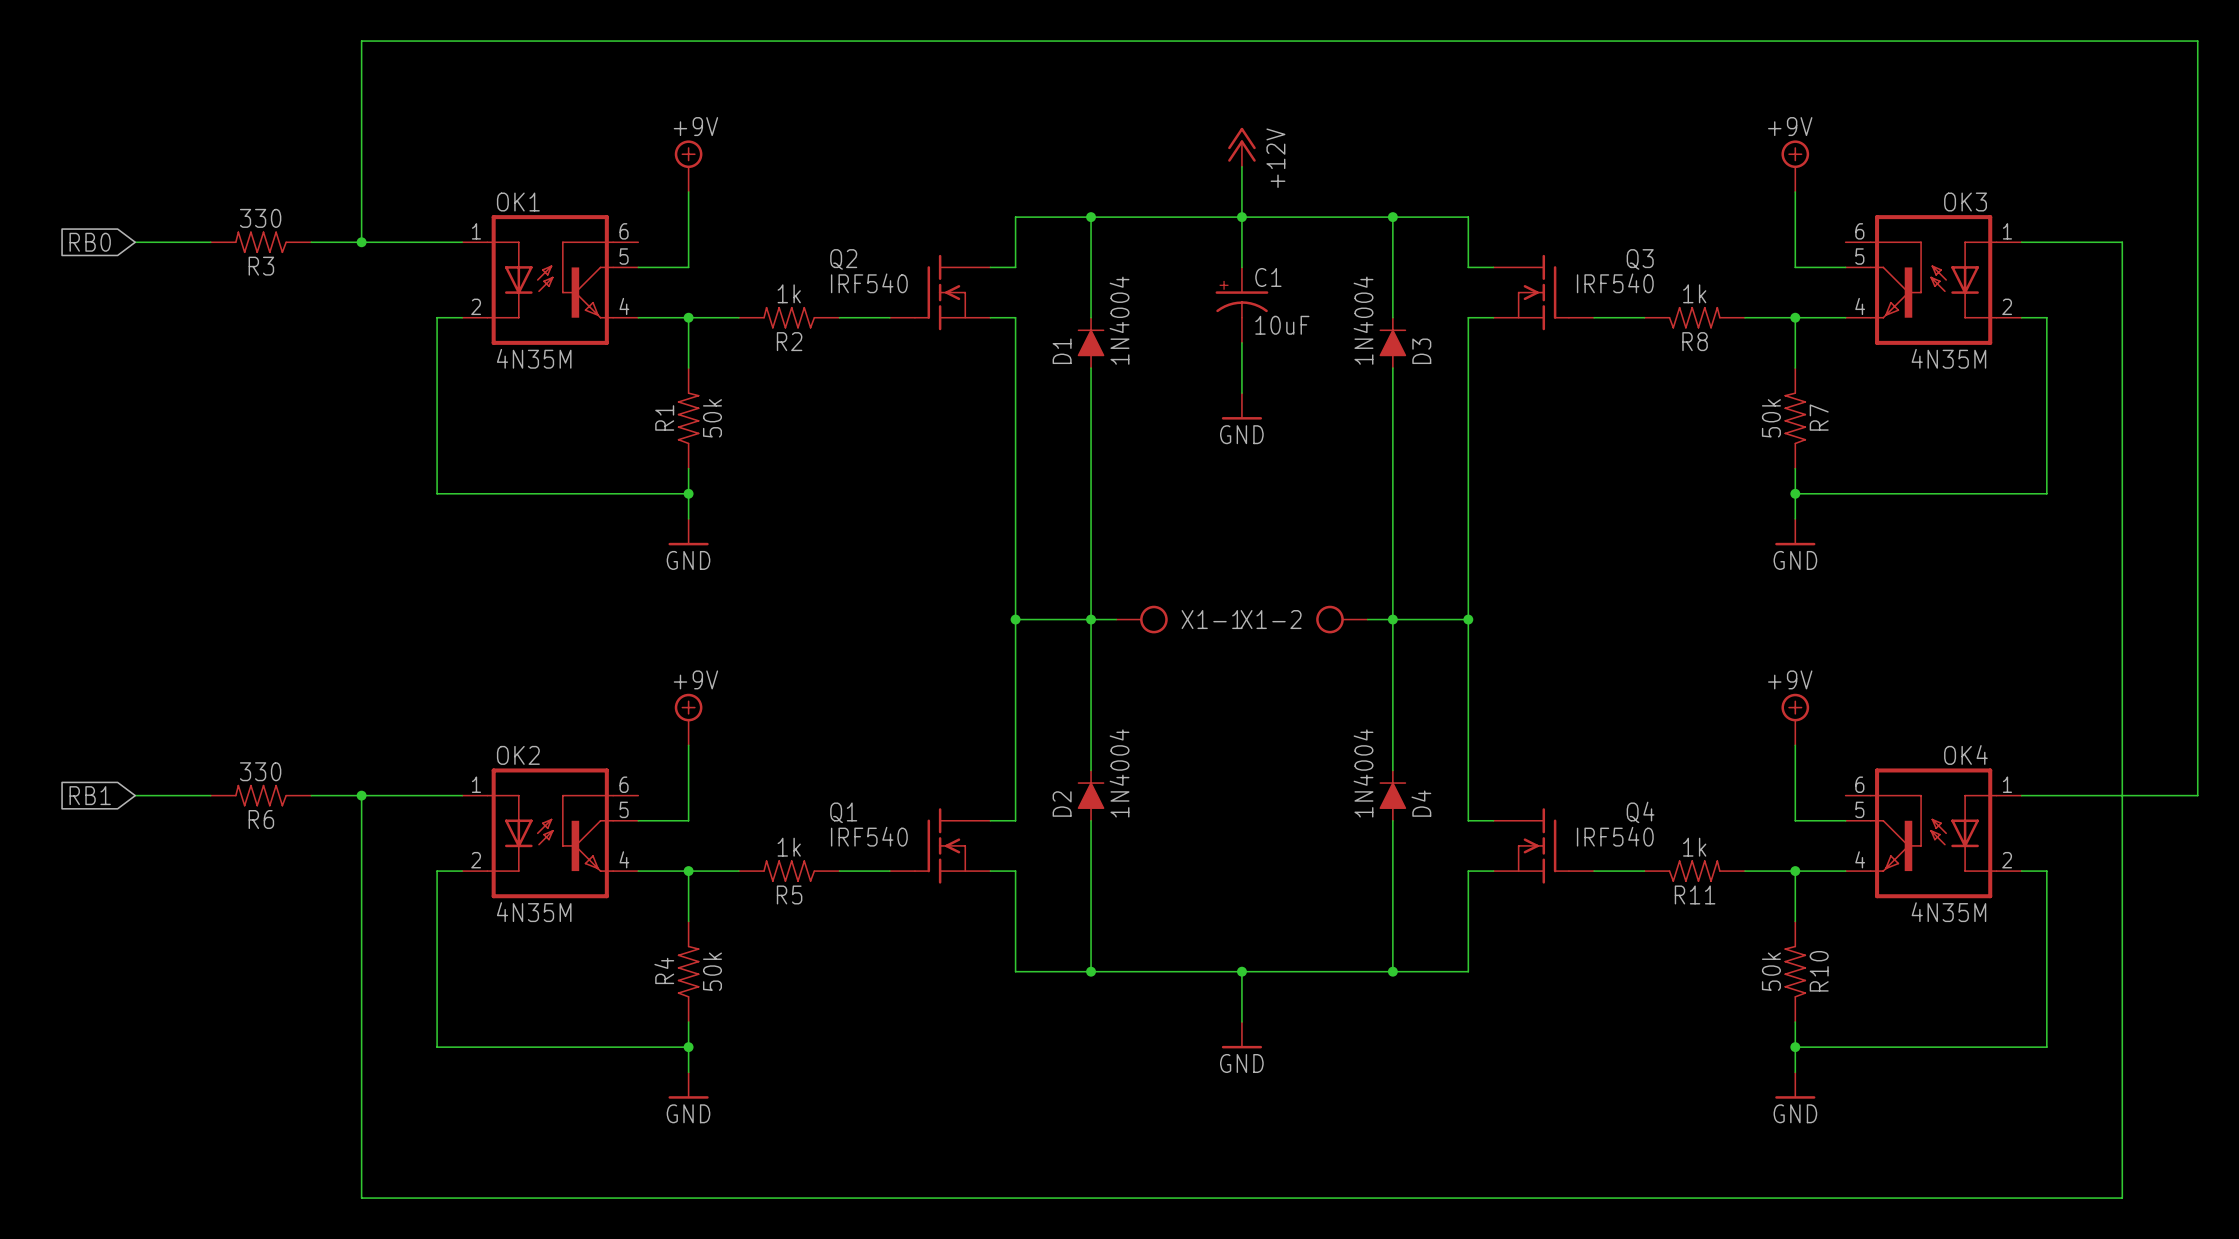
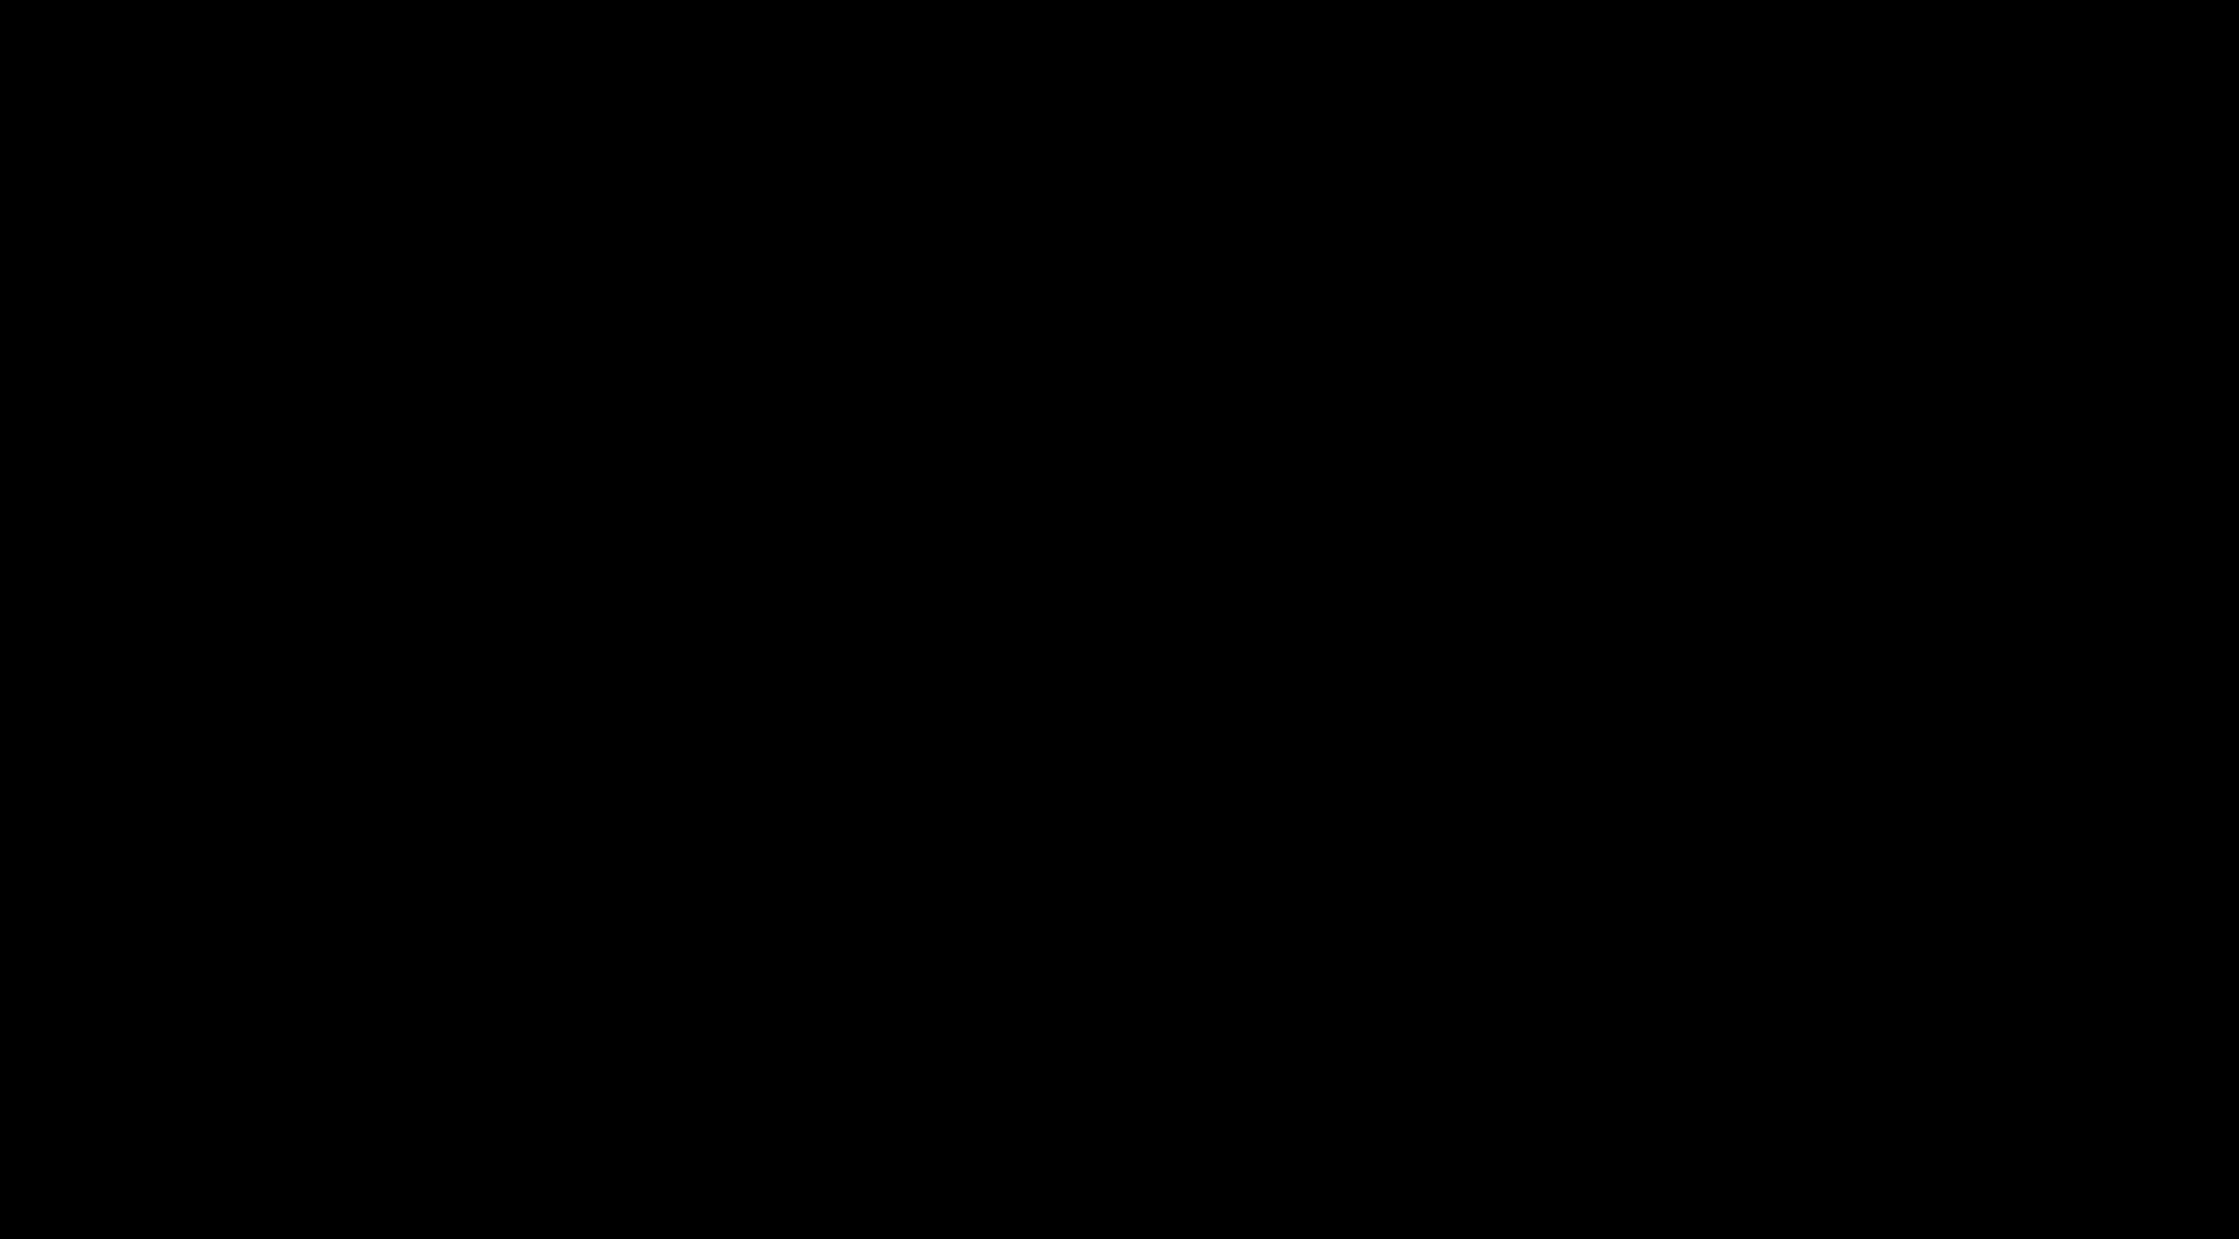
power symbol: +12V (1241, 147) -> none
power symbol: +9V (688, 166) -> none
wire: (1241, 166) (1241, 267) -> none
power symbol: +9V (1795, 166) -> none
wire: (688, 191) (688, 267) (638, 267) -> none
wire: (1795, 191) (1795, 267) (1845, 267) -> none
wire: (1091, 217) (1091, 317) -> none
junction: (1091, 217) -> none
junction: (1241, 217) -> none
wire: (1392, 217) (1392, 317) -> none
junction: (1392, 217) -> none
global label: RB0 (90, 242) -> none
wire: (135, 242) (210, 242) -> none
R3: 330 (261, 242) -> none
wire: (311, 242) (462, 242) -> none
wire: (361, 242) (361, 41) (2197, 41) (2197, 795) (2021, 795) -> none
junction: (361, 242) -> none
wire: (2021, 242) (2122, 242) (2122, 1198) (361, 1198) (361, 795) -> none
wire: (990, 267) (1015, 267) (1015, 217) (1468, 217) (1468, 267) (1493, 267) -> none
OK1: 4N35M (550, 279) -> none
OK3: 4N35M (1933, 279) -> none
Q2: IRF540 (940, 292) -> none
Q3: IRF540 (1543, 292) -> none
C1: 10uF (1241, 305) -> none
wire: (462, 317) (437, 317) (437, 493) (688, 493) -> none
wire: (638, 317) (738, 317) -> none
wire: (688, 317) (688, 368) -> none
junction: (688, 317) -> none
R2: 1k (789, 317) -> none
wire: (839, 317) (889, 317) -> none
wire: (990, 317) (1015, 317) (1015, 820) (990, 820) -> none
wire: (1493, 317) (1468, 317) (1468, 820) (1493, 820) -> none
wire: (1594, 317) (1644, 317) -> none
R8: 1k (1694, 317) -> none
wire: (1745, 317) (1845, 317) -> none
wire: (1795, 317) (1795, 368) -> none
junction: (1795, 317) -> none
wire: (2021, 317) (2046, 317) (2046, 493) (1795, 493) -> none
D1: 1N4004 (1091, 342) -> none
wire: (1241, 342) (1241, 393) -> none
D3: 1N4004 (1392, 342) -> none
wire: (1091, 368) (1091, 770) -> none
wire: (1392, 368) (1392, 770) -> none
power symbol: GND (1241, 406) -> none
R1: 50k (688, 418) -> none
R7: 50k (1795, 418) -> none
wire: (688, 468) (688, 518) -> none
wire: (1795, 468) (1795, 518) -> none
junction: (688, 493) -> none
junction: (1795, 493) -> none
power symbol: GND (688, 532) -> none
power symbol: GND (1795, 532) -> none
wire: (1015, 619) (1116, 619) -> none
junction: (1015, 619) -> none
junction: (1091, 619) -> none
X1-1: (1141, 619) -> none
X1-2: (1341, 619) -> none
wire: (1367, 619) (1468, 619) -> none
junction: (1392, 619) -> none
junction: (1468, 619) -> none
power symbol: +9V (688, 719) -> none
power symbol: +9V (1795, 719) -> none
wire: (688, 745) (688, 820) (638, 820) -> none
wire: (1795, 745) (1795, 820) (1845, 820) -> none
global label: RB1 (90, 795) -> none
wire: (135, 795) (210, 795) -> none
R6: 330 (261, 795) -> none
wire: (311, 795) (462, 795) -> none
junction: (361, 795) -> none
D2: 1N4004 (1091, 795) -> none
D4: 1N4004 (1392, 795) -> none
wire: (1091, 820) (1091, 971) -> none
wire: (1392, 820) (1392, 971) -> none
OK2: 4N35M (550, 833) -> none
OK4: 4N35M (1933, 833) -> none
Q1: IRF540 (940, 845) -> none
Q4: IRF540 (1543, 845) -> none
wire: (462, 871) (437, 871) (437, 1047) (688, 1047) -> none
wire: (638, 871) (738, 871) -> none
wire: (688, 871) (688, 921) -> none
junction: (688, 871) -> none
R5: 1k (789, 871) -> none
wire: (839, 871) (889, 871) -> none
wire: (990, 871) (1015, 871) (1015, 971) (1468, 971) (1468, 871) (1493, 871) -> none
wire: (1594, 871) (1644, 871) -> none
R11: 1k (1694, 871) -> none
wire: (1745, 871) (1845, 871) -> none
wire: (1795, 871) (1795, 921) -> none
junction: (1795, 871) -> none
wire: (2021, 871) (2046, 871) (2046, 1047) (1795, 1047) -> none
R4: 50k (688, 971) -> none
junction: (1091, 971) -> none
wire: (1241, 971) (1241, 1021) -> none
junction: (1241, 971) -> none
junction: (1392, 971) -> none
R10: 50k (1795, 971) -> none
wire: (688, 1021) (688, 1072) -> none
wire: (1795, 1021) (1795, 1072) -> none
power symbol: GND (1241, 1035) -> none
junction: (688, 1047) -> none
junction: (1795, 1047) -> none
power symbol: GND (688, 1085) -> none
power symbol: GND (1795, 1085) -> none

